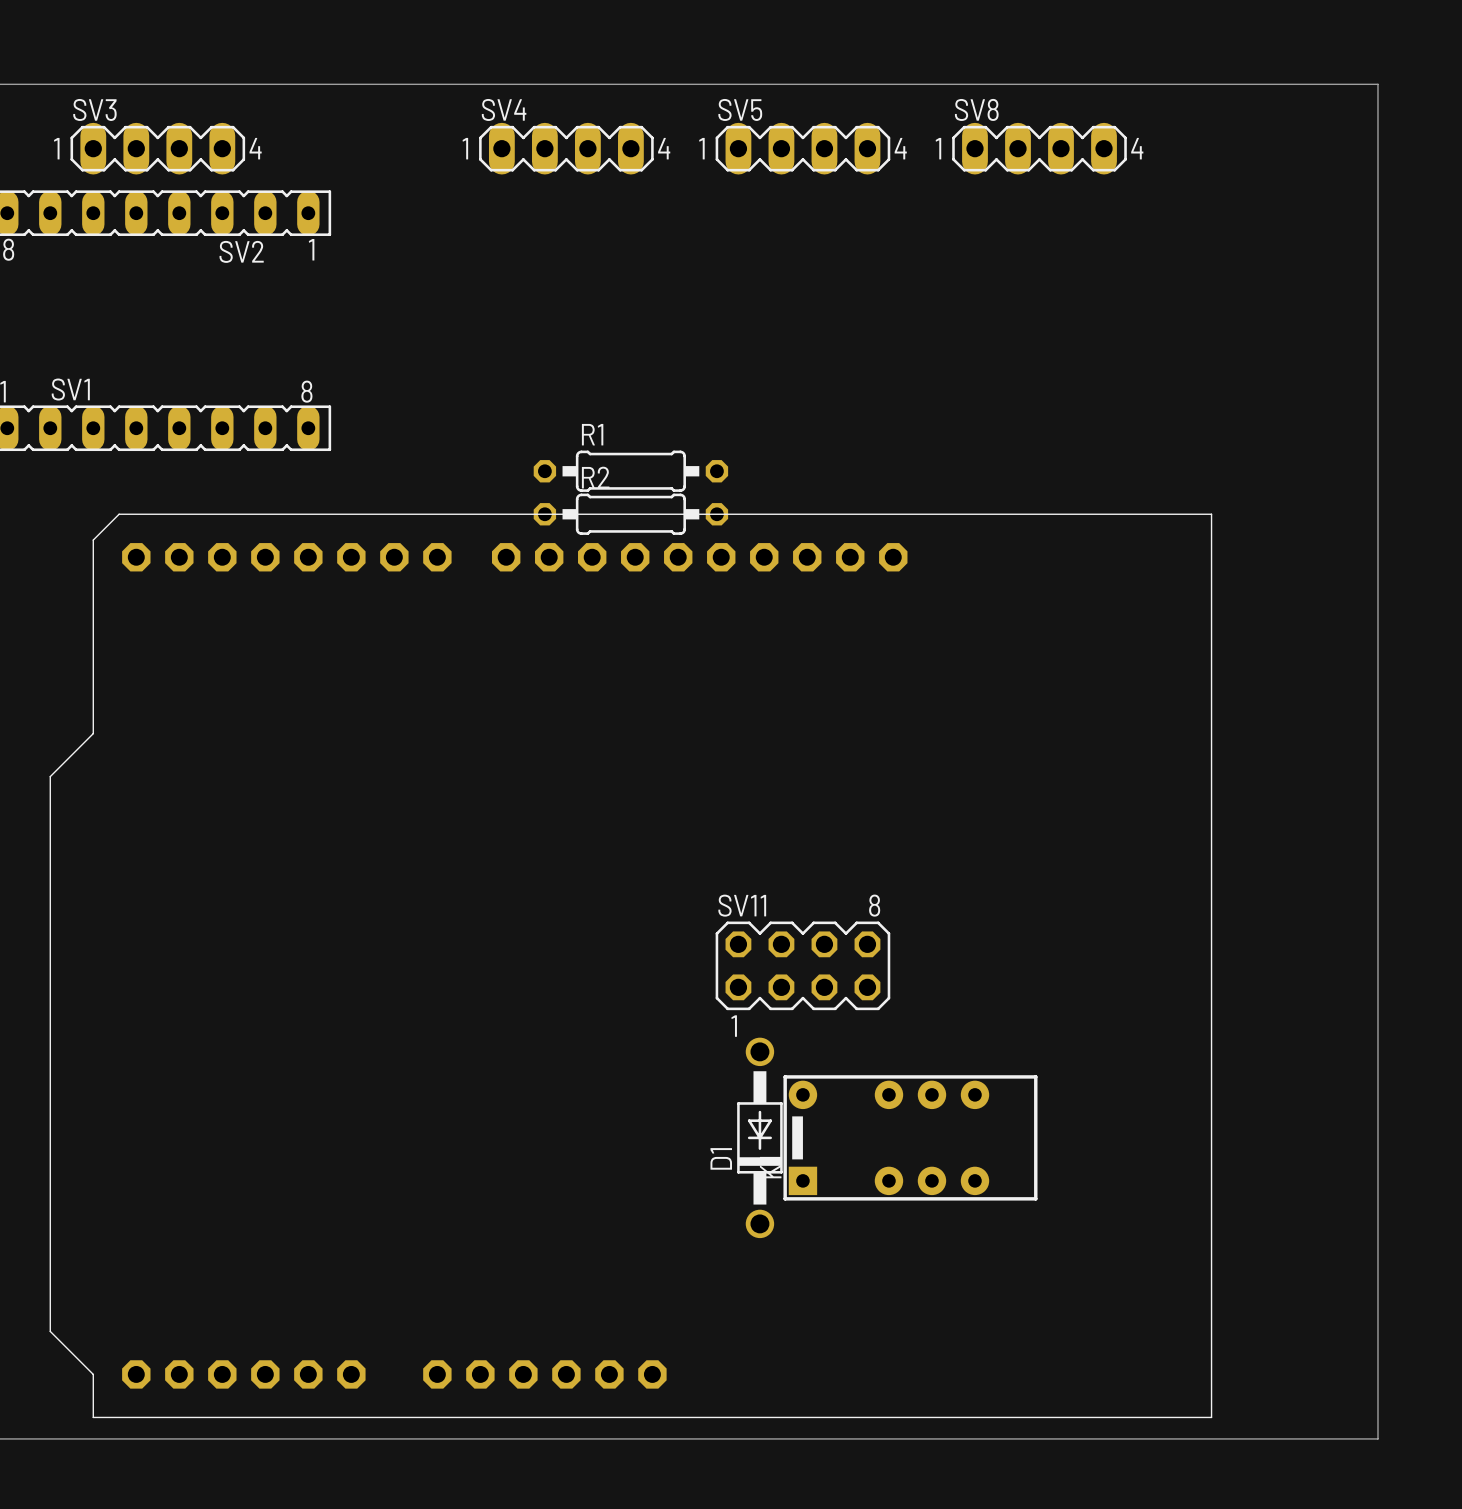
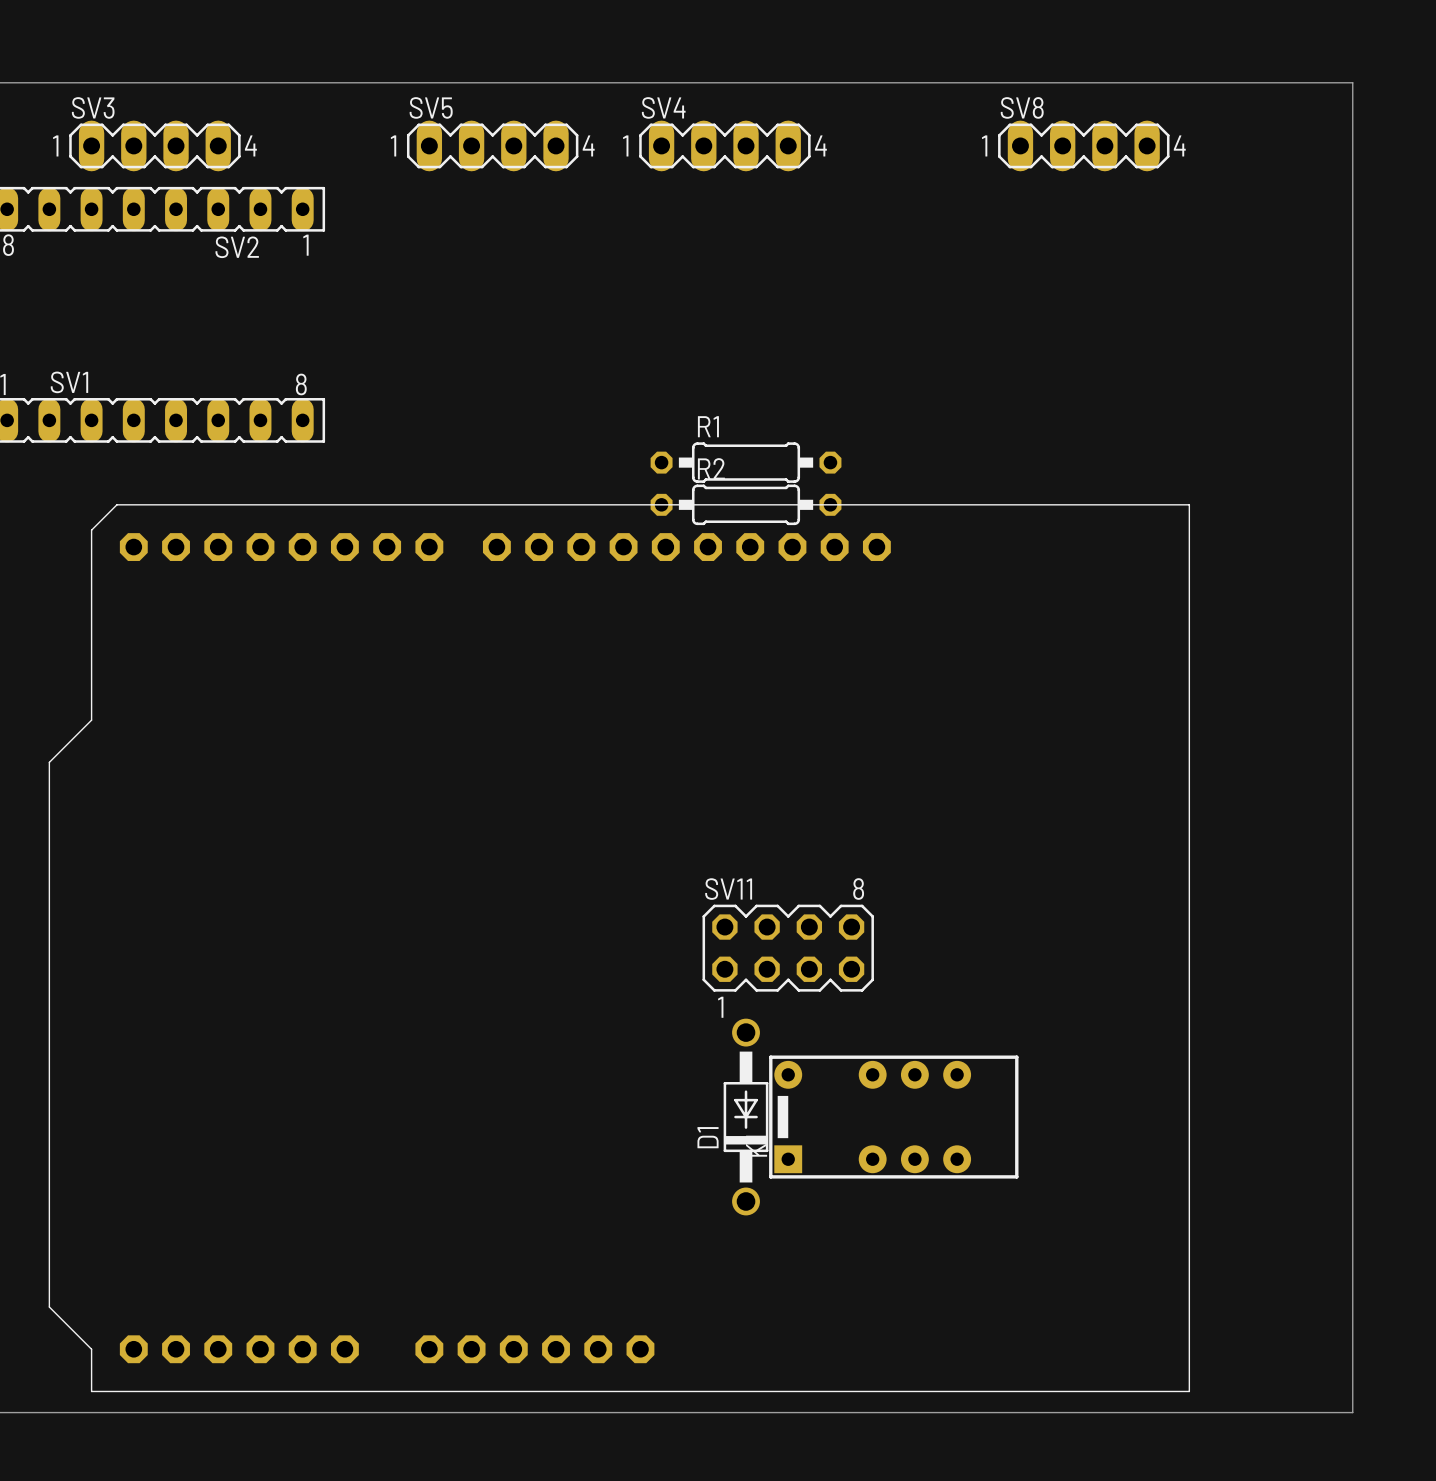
SV4 position: (566, 148) -> (724, 145)
SV5 position: (802, 148) -> (492, 145)
SV8 position: (1039, 148) -> (1083, 145)
R1 position: (630, 471) -> (746, 462)
R2 position: (630, 514) -> (746, 504)

